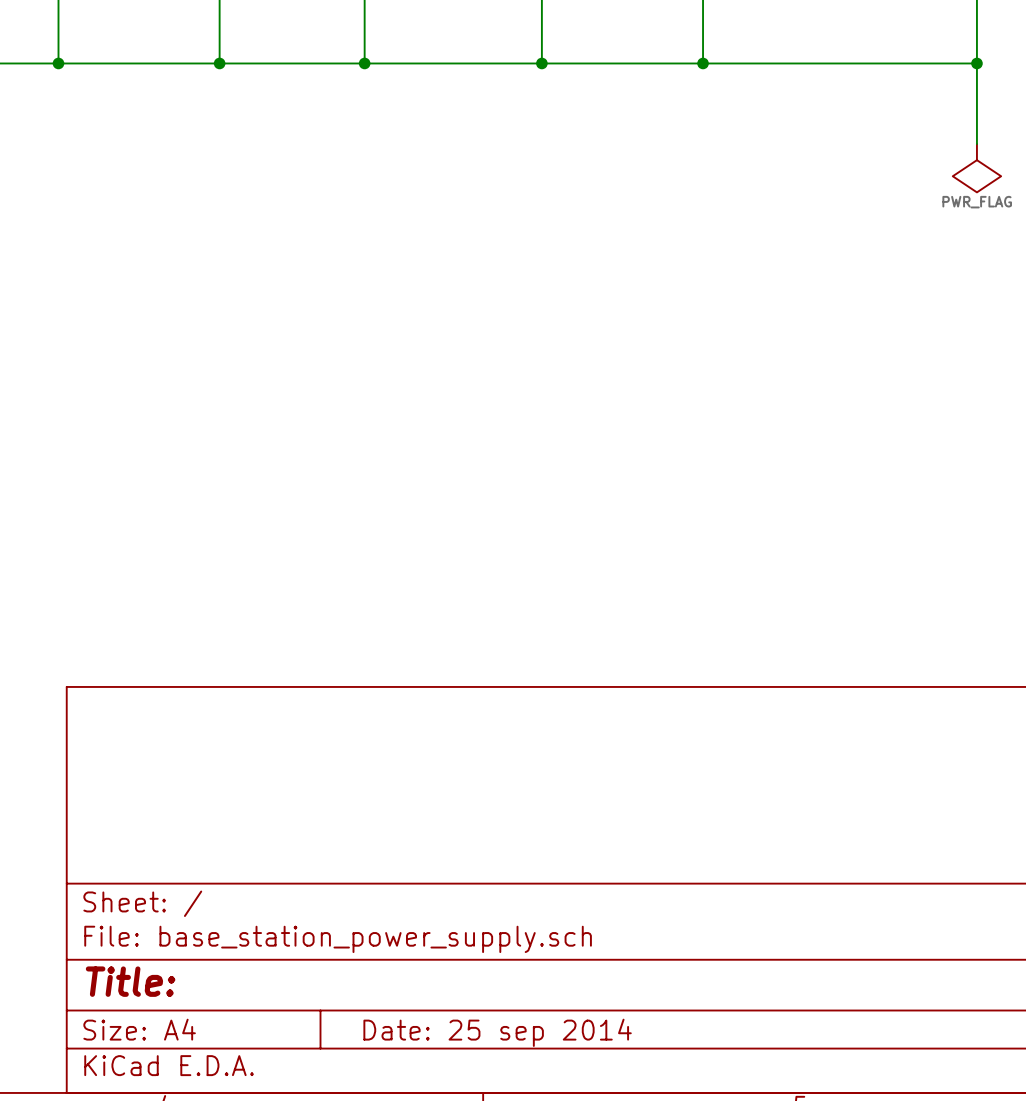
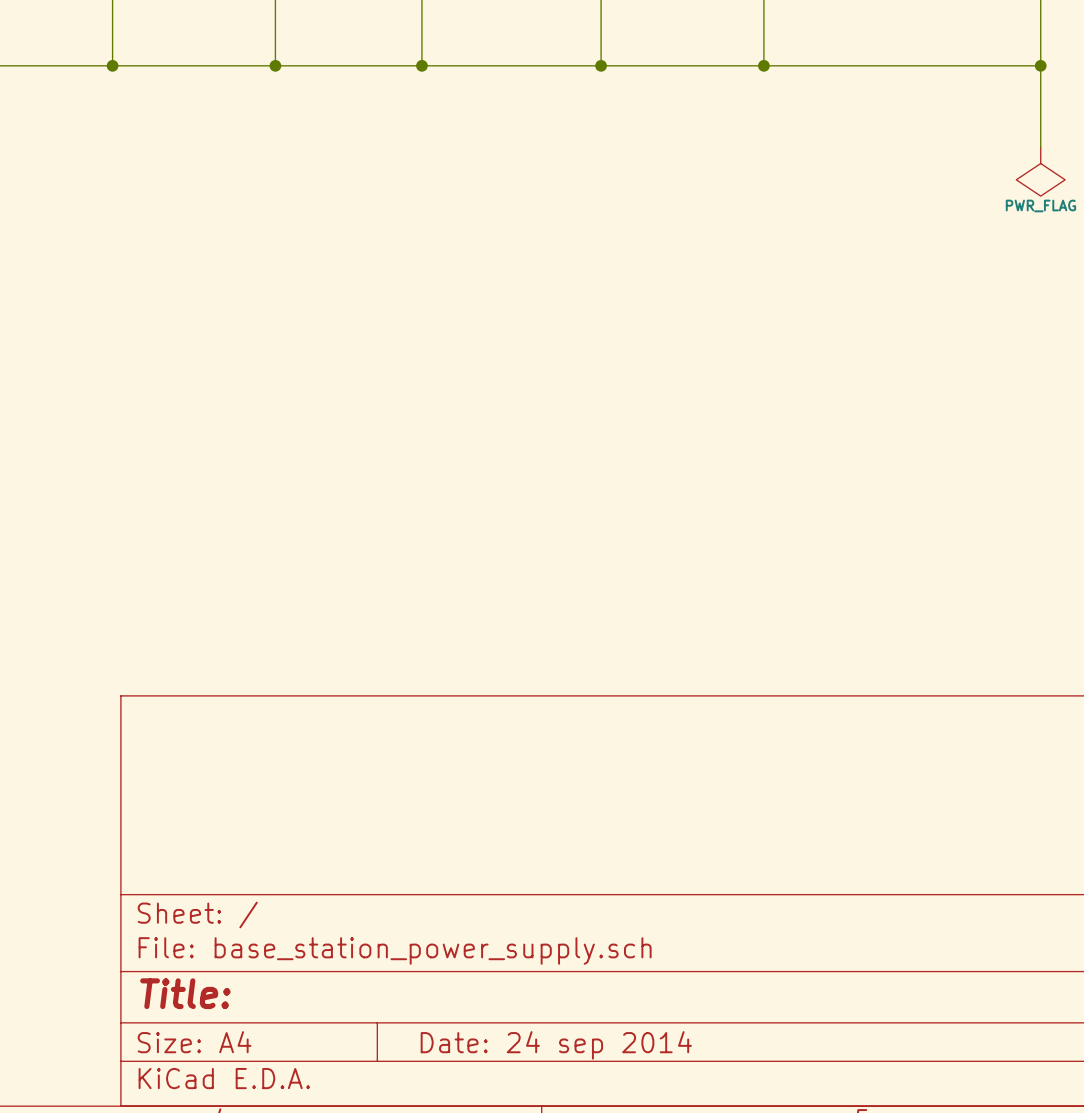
title block: Date: 25 sep 2014 (497, 1032) -> Date: 24 sep 2014 (556, 1045)

